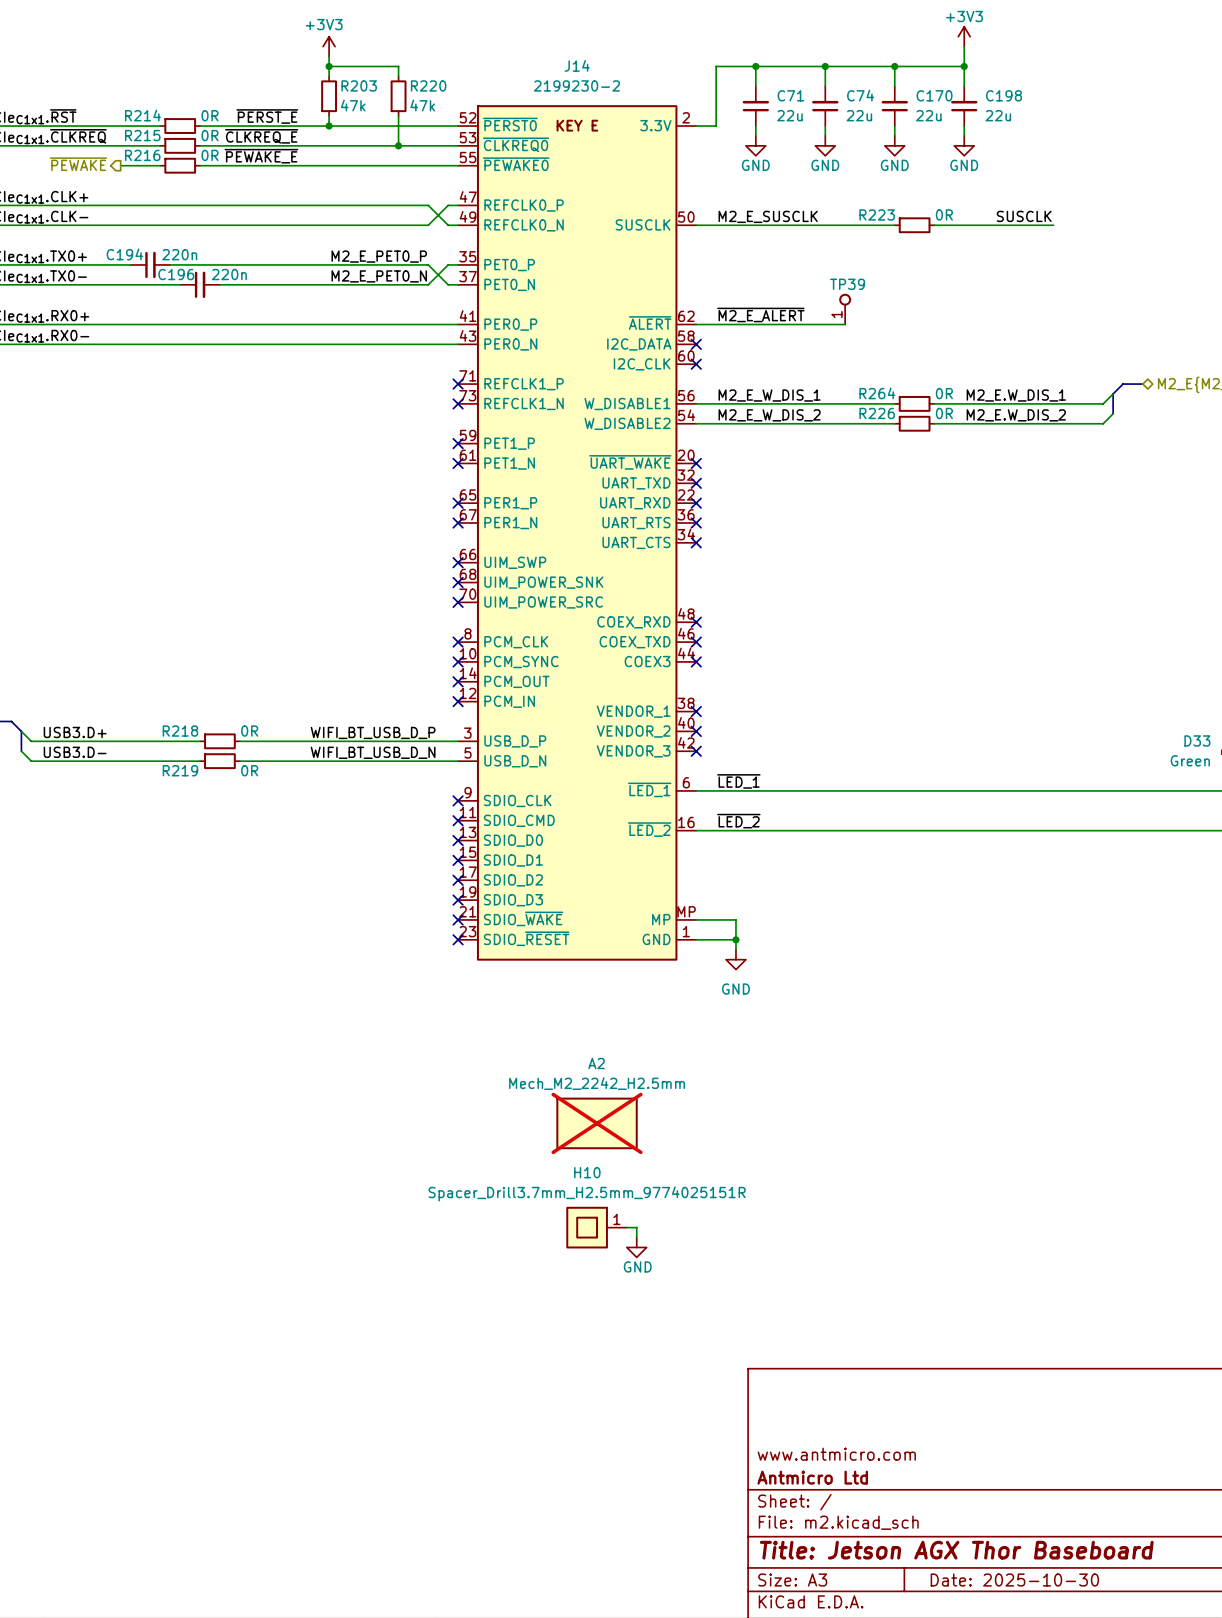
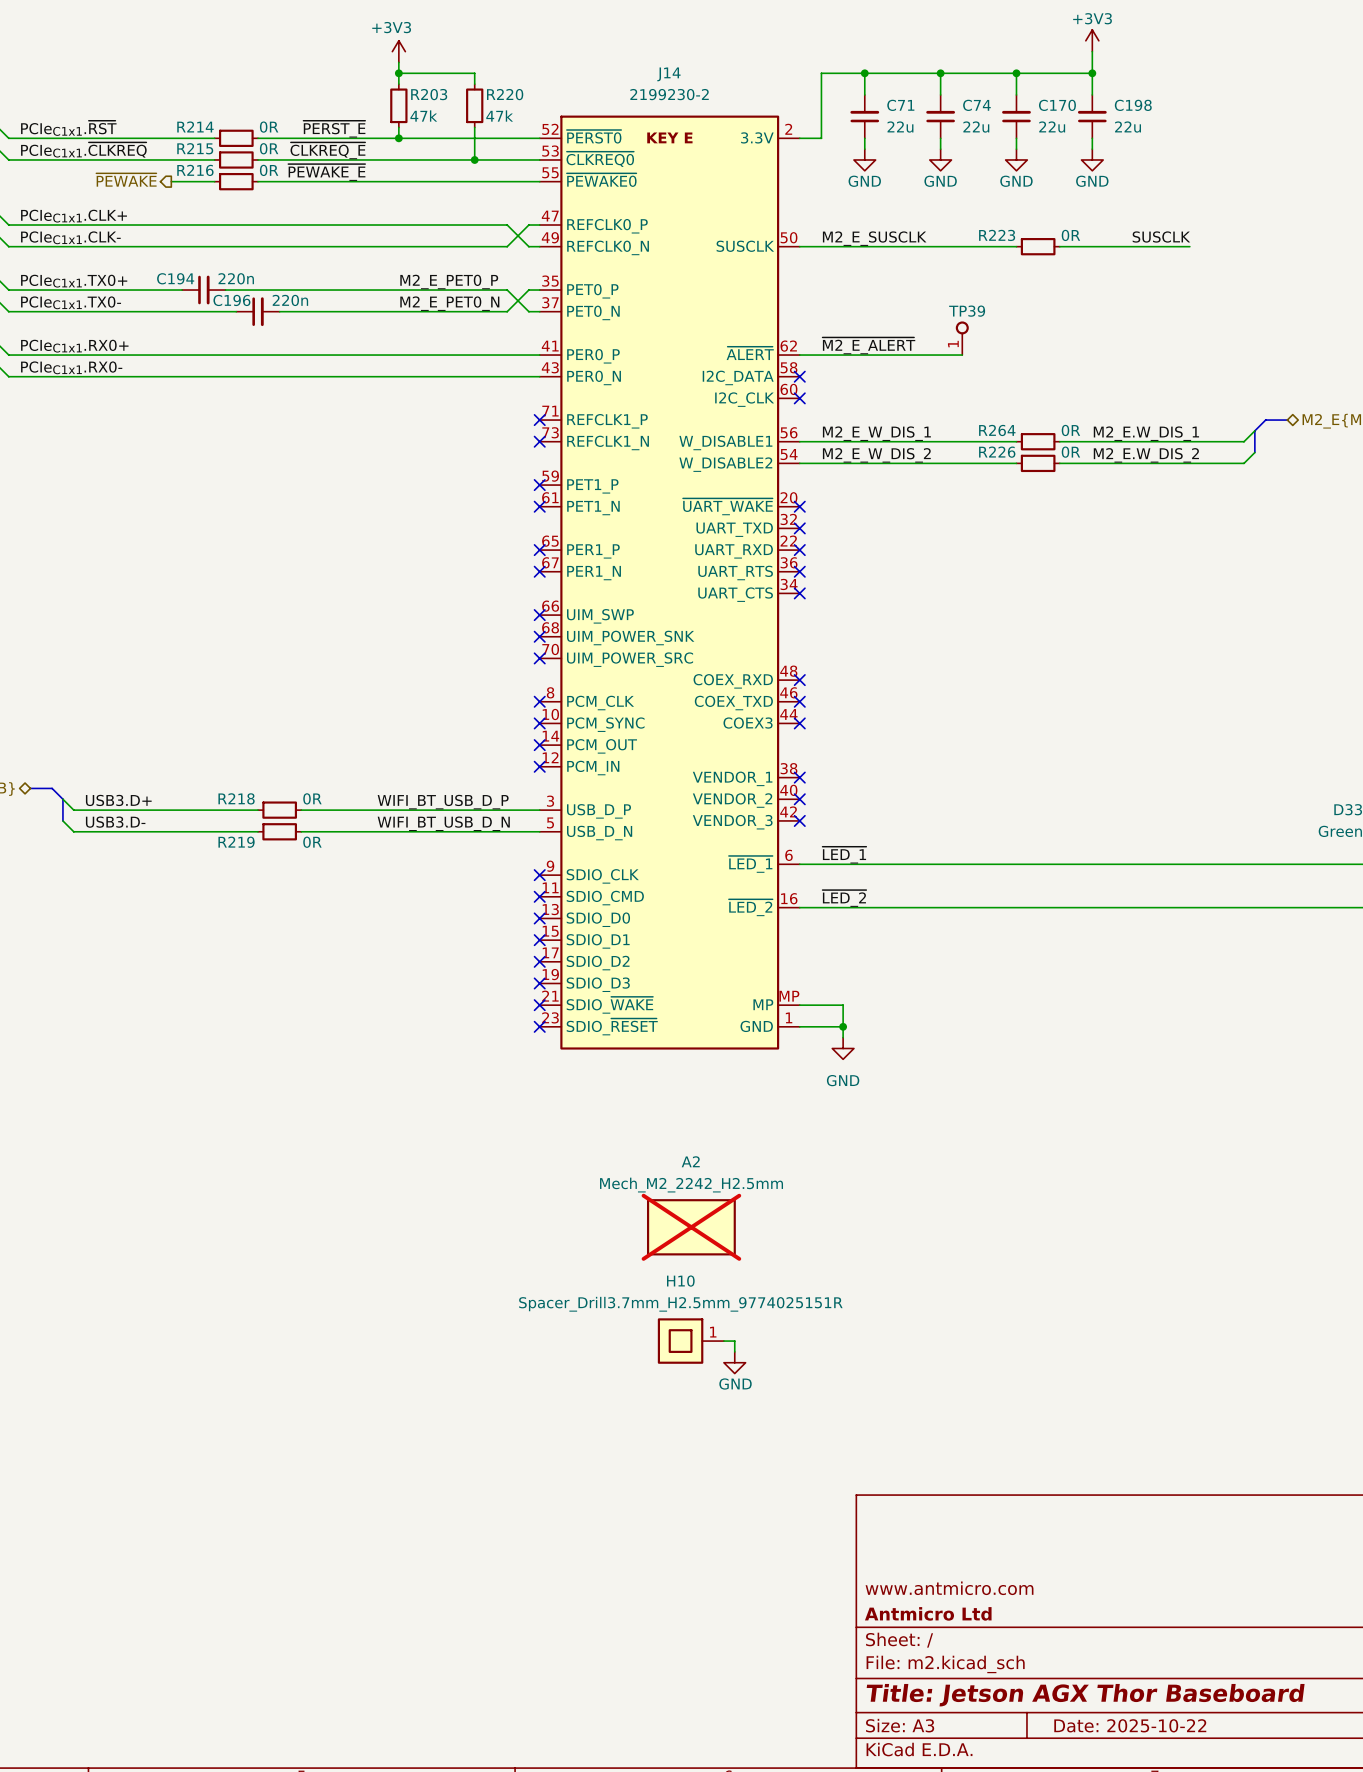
title block: Date: 2025-10-30 (1014, 1580) -> Date: 2025-10-22 (1130, 1725)

